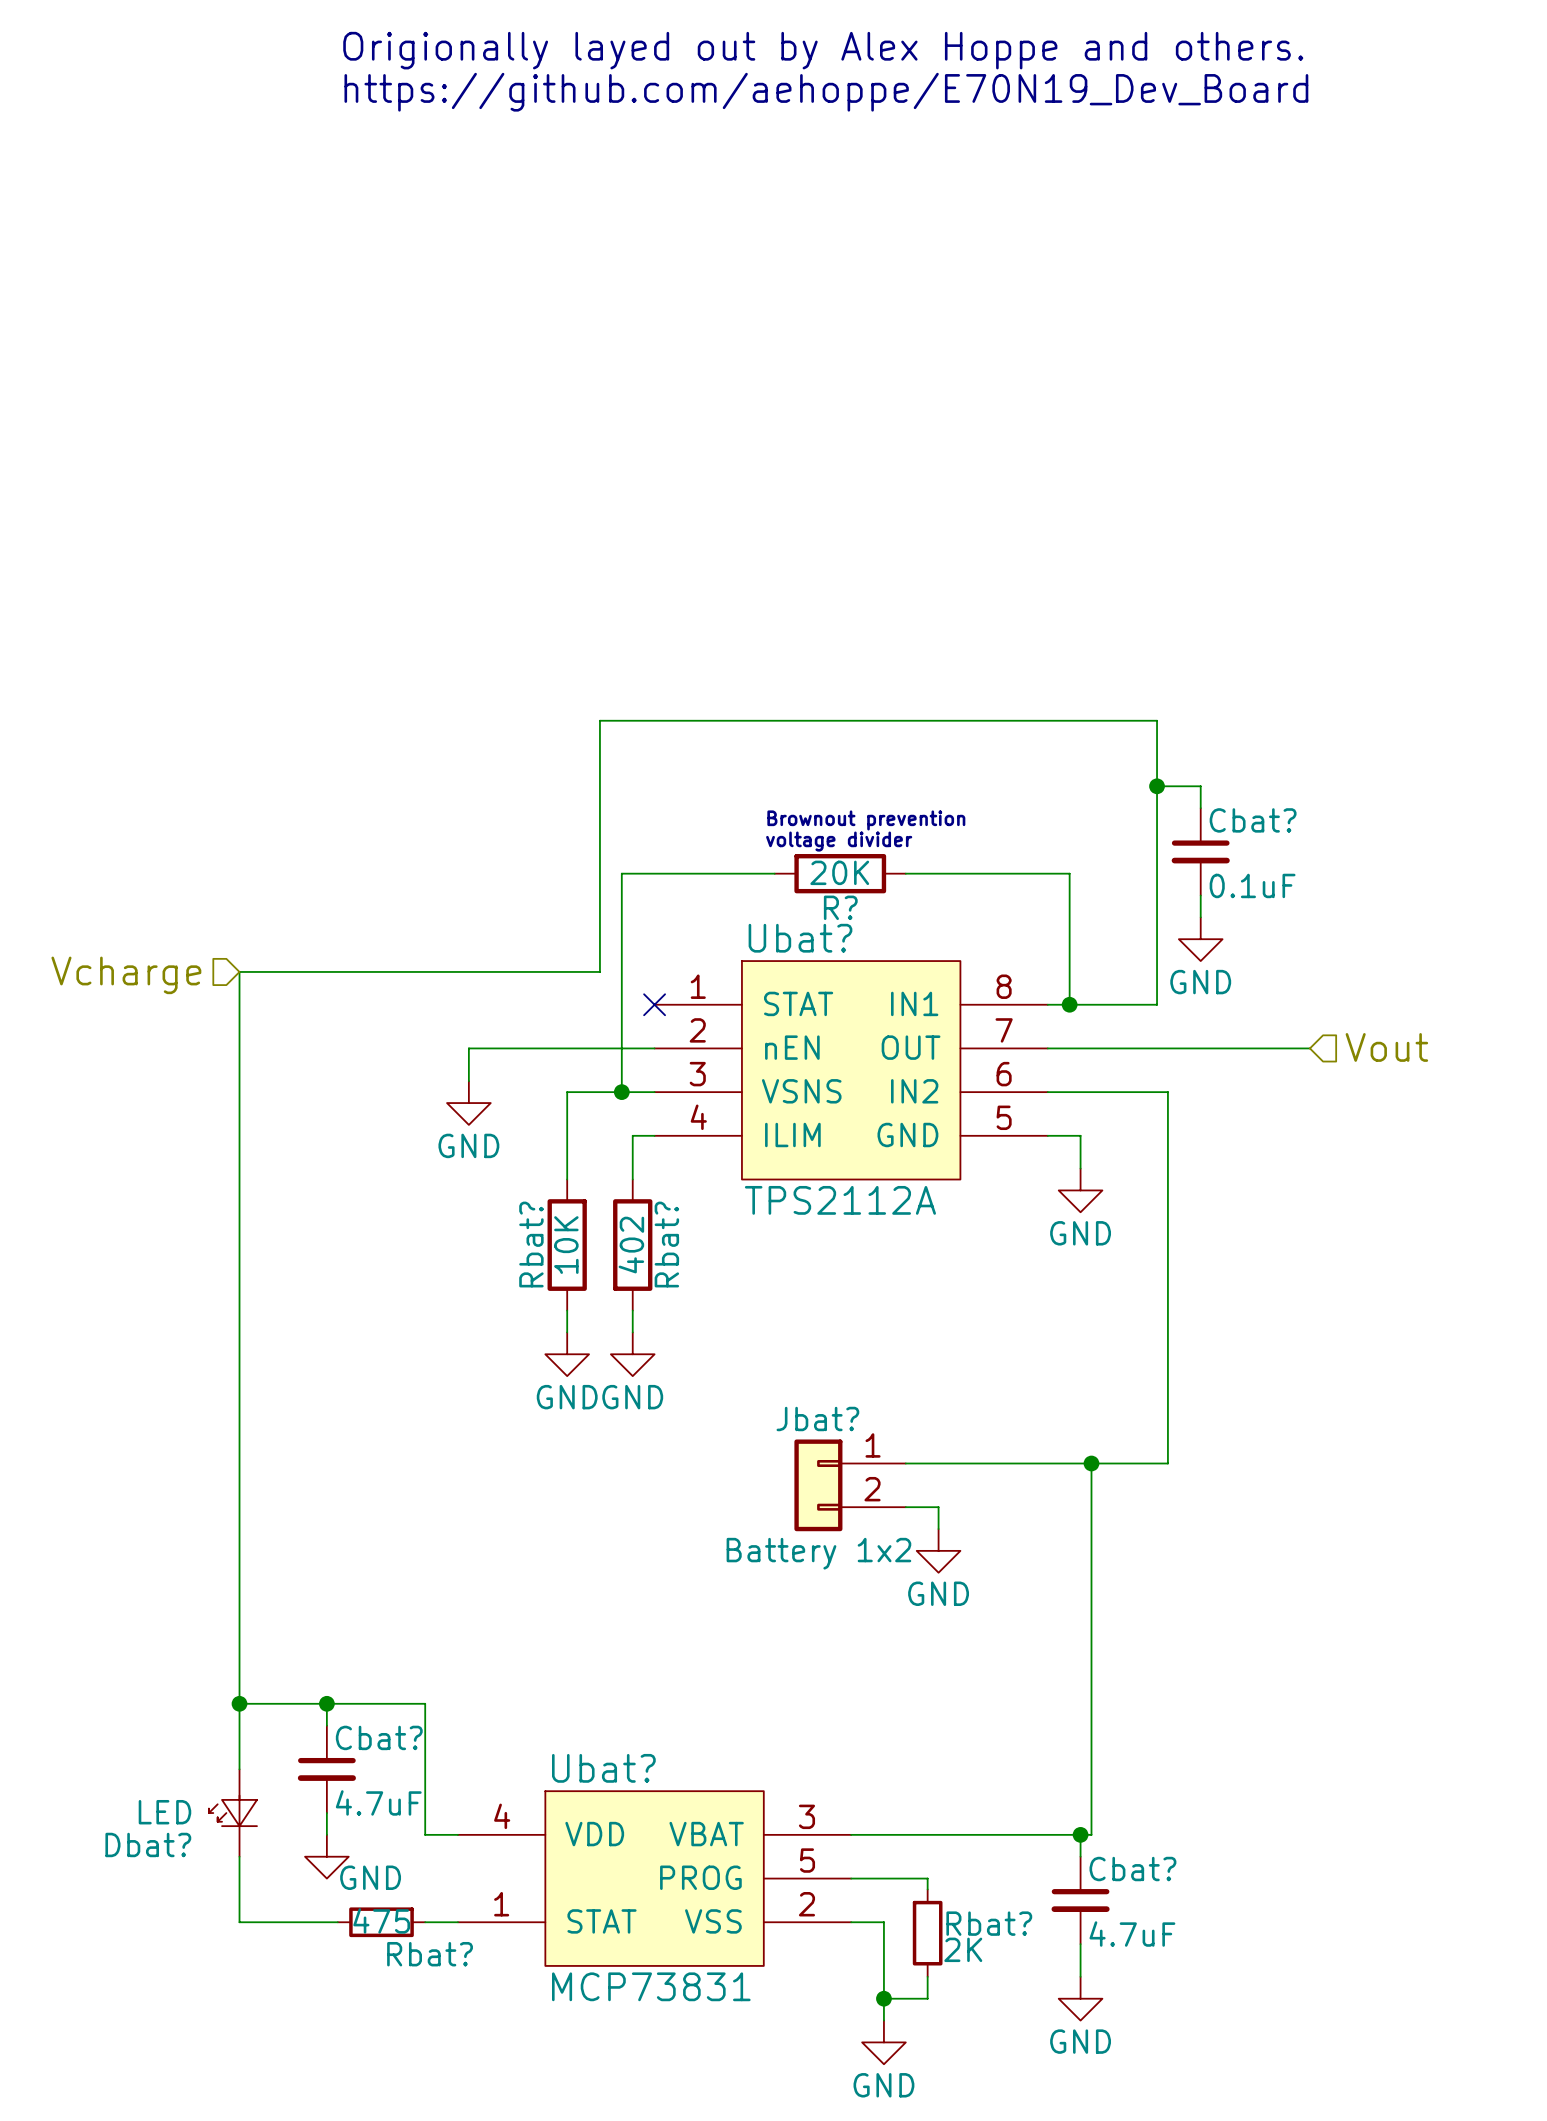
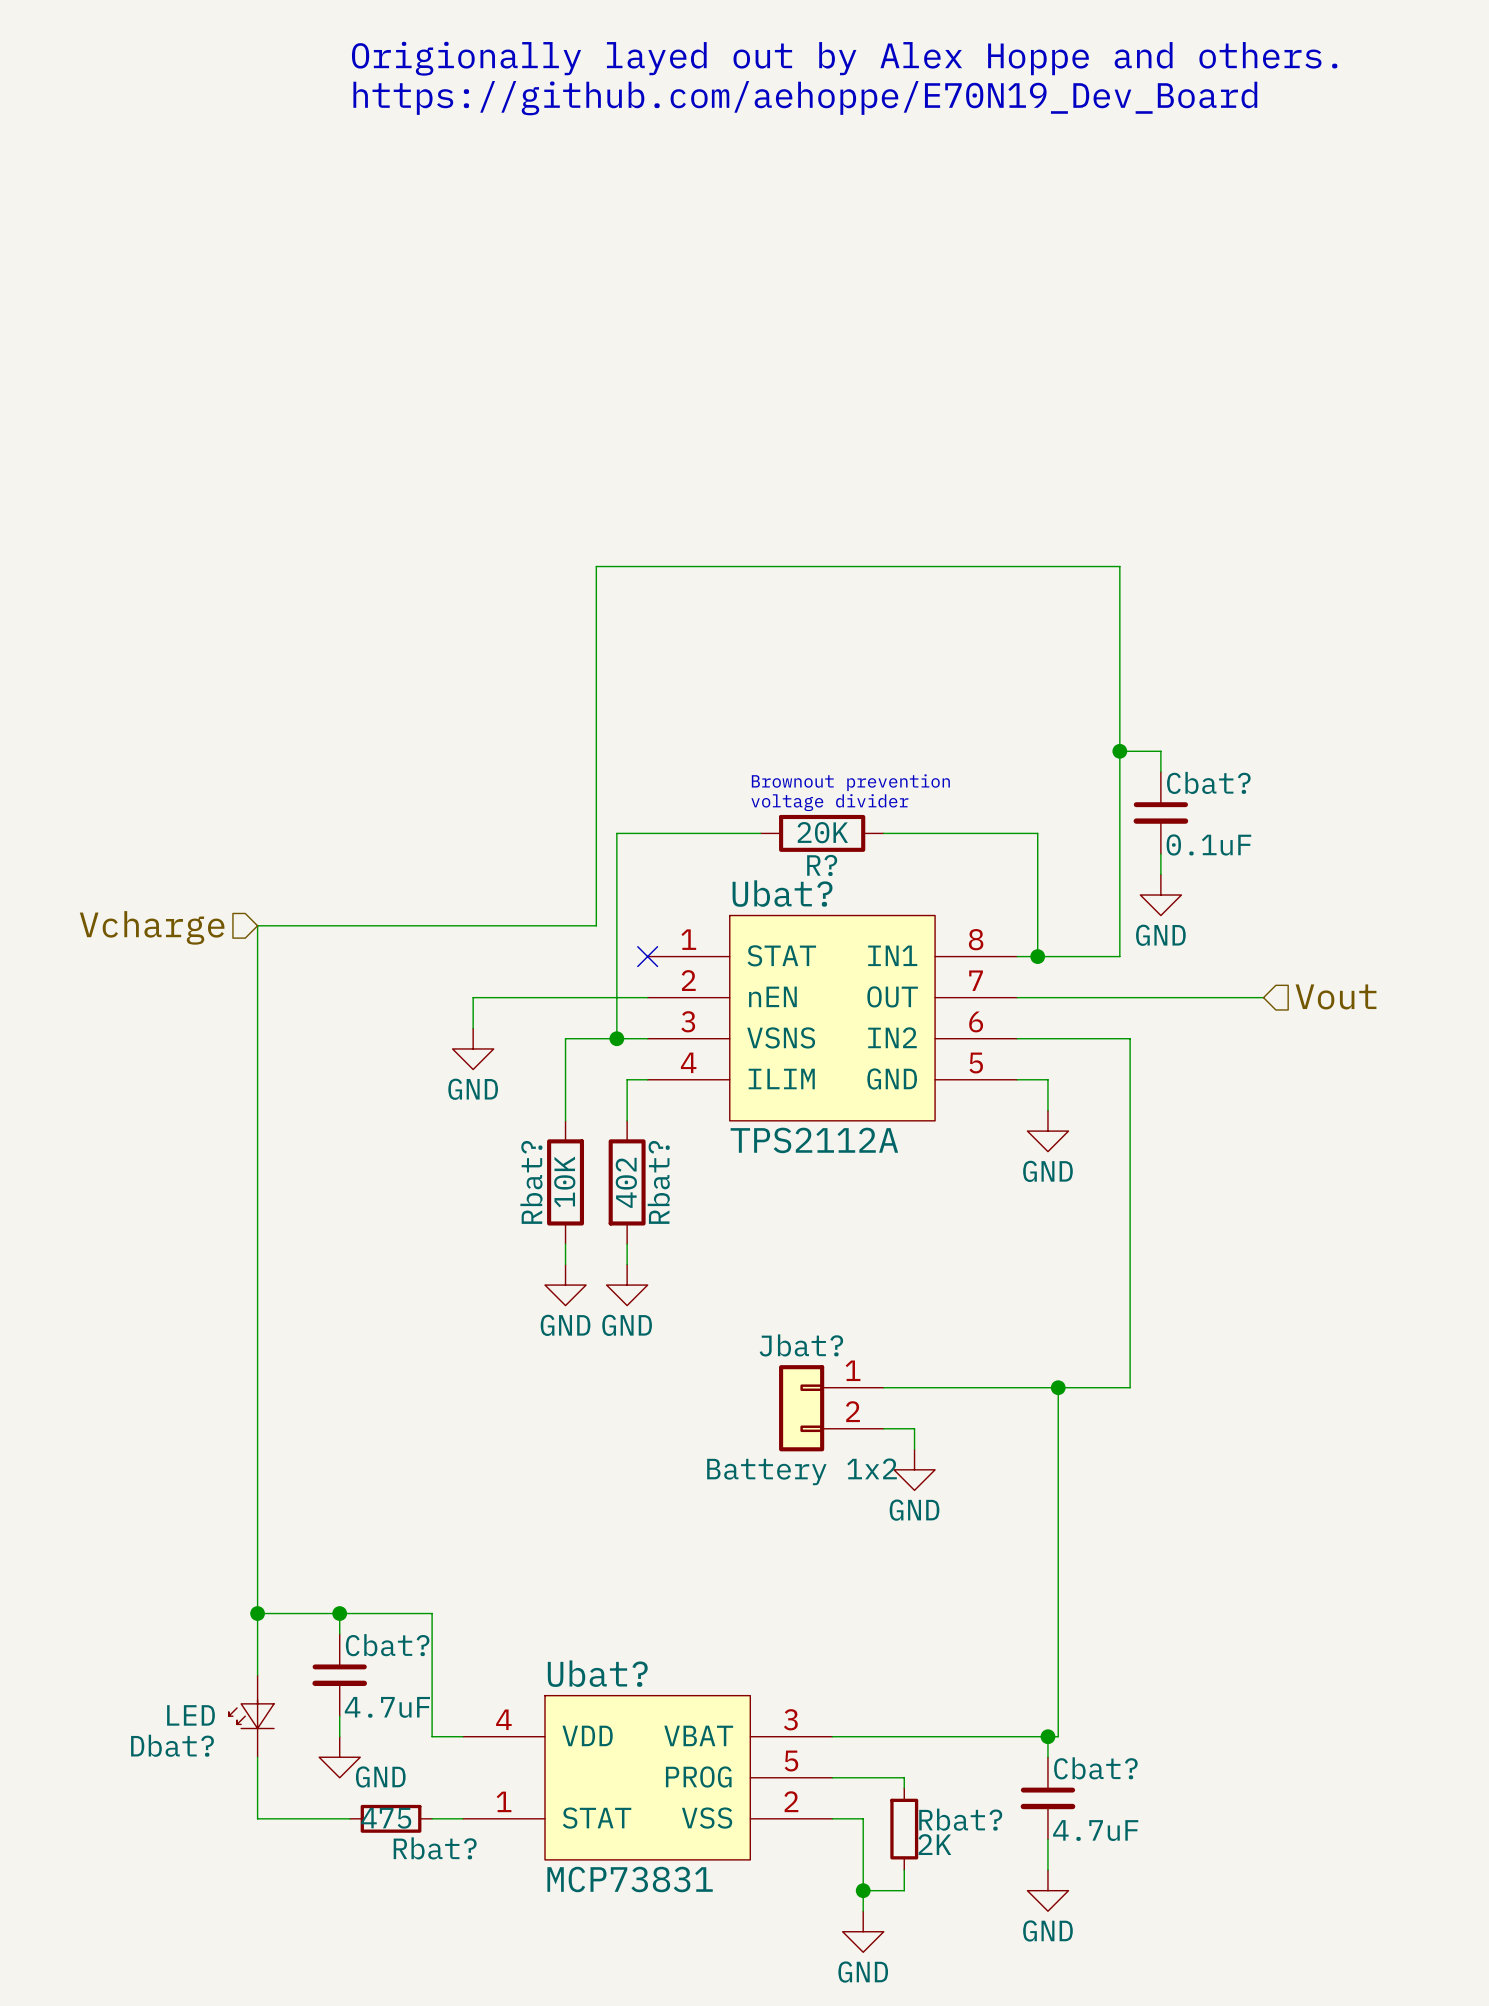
wire: (599, 720) (1157, 720) -> (596, 689) (596, 566) (1119, 566) (1119, 689)

